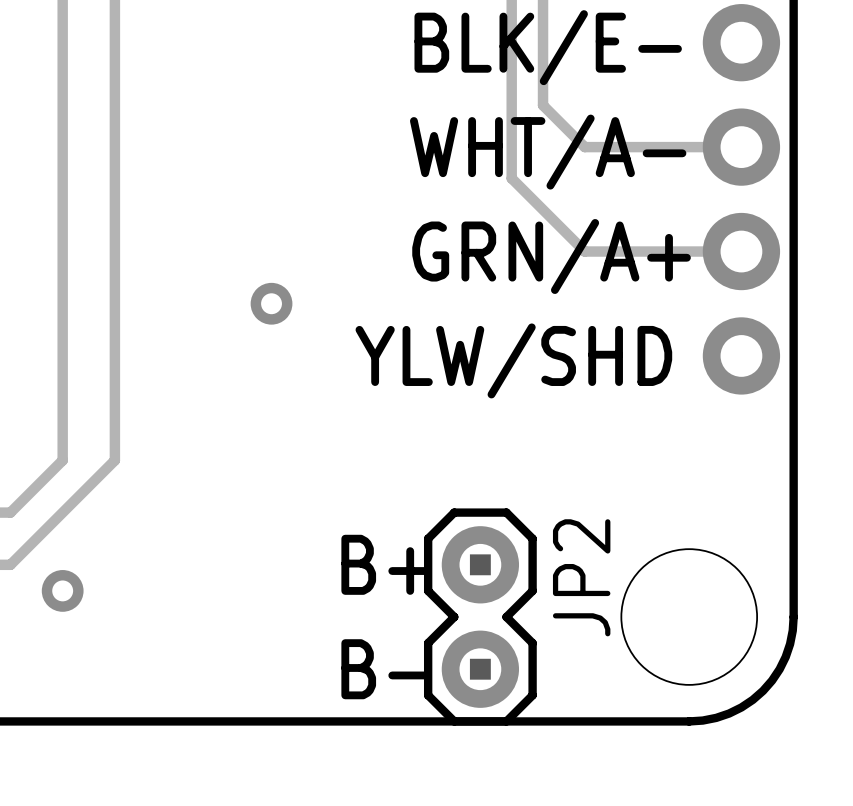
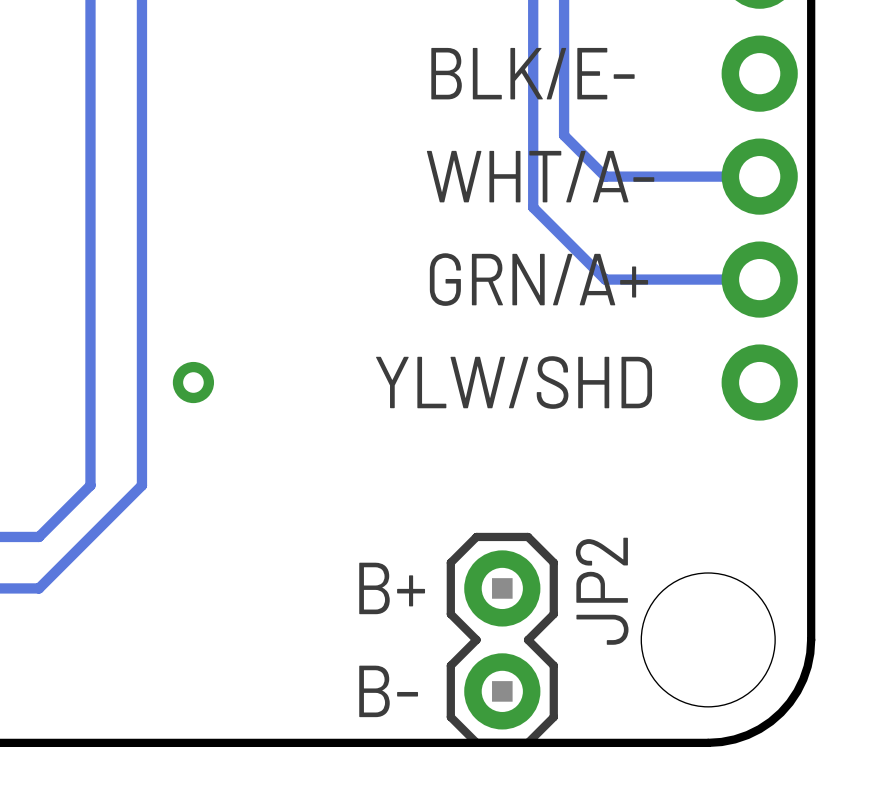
via position: (271, 303) -> (193, 382)
via: (62, 590) -> none

